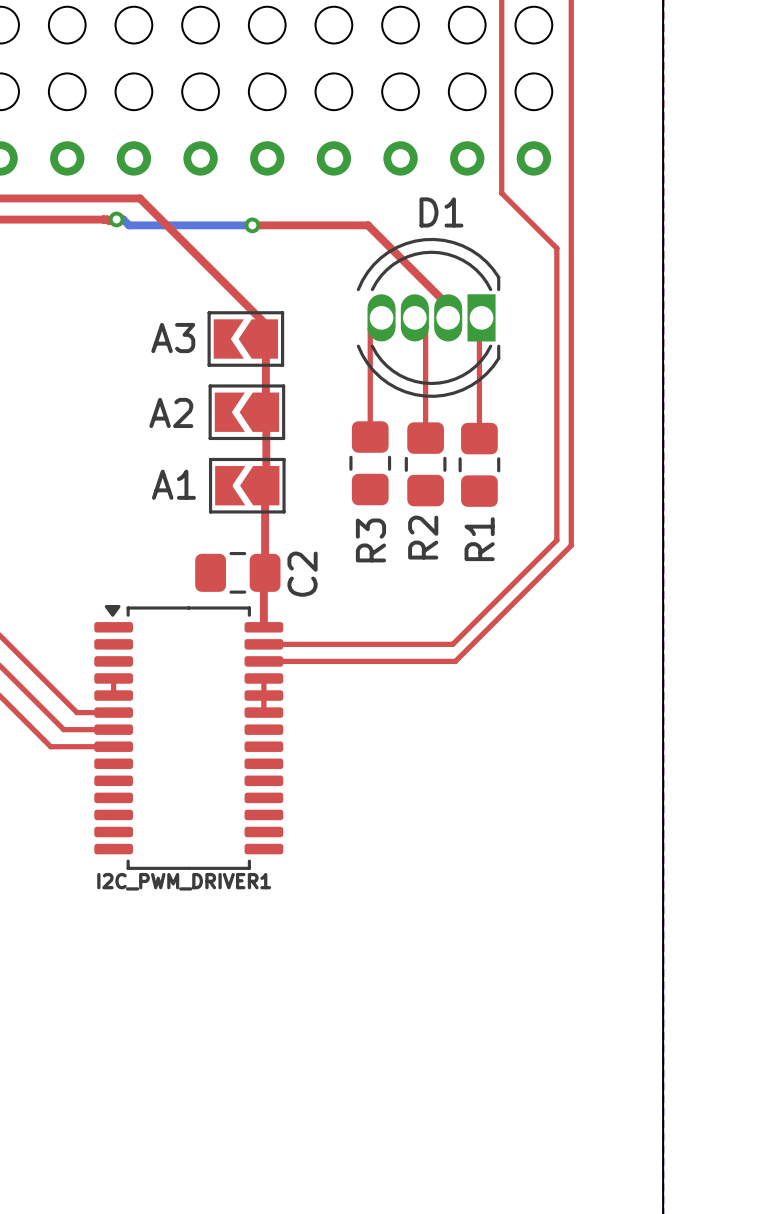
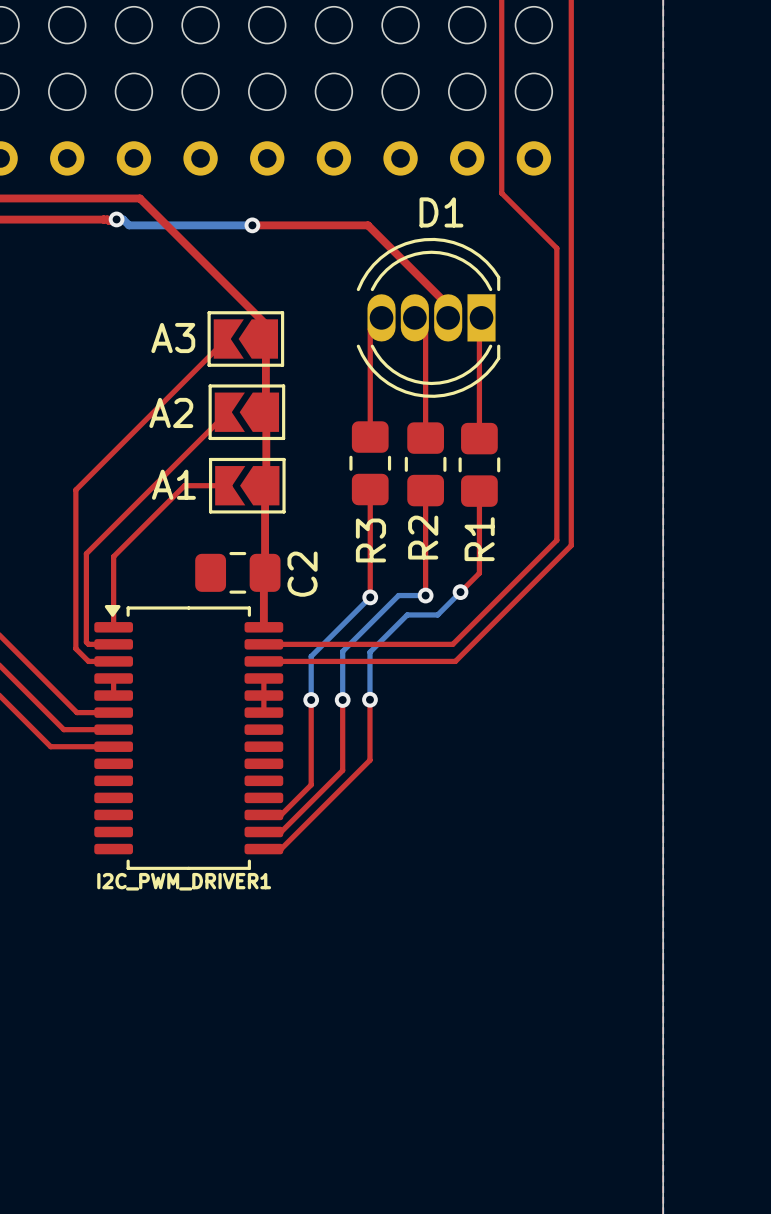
top track: none -> (226, 339) (75, 489) (75, 648) (88, 661) (113, 661)
top track: none -> (227, 412) (86, 553) (86, 642) (88, 644) (113, 644)
top track: none -> (228, 485) (184, 485) (113, 556) (113, 627)
top track: none -> (370, 489) (370, 597)
top track: none -> (425, 490) (425, 595)
top track: none -> (479, 491) (479, 573) (460, 592)
bottom track: none -> (460, 592) (437, 614) (407, 614) (369, 652) (369, 699)
via: none -> (460, 592)
bottom track: none -> (425, 595) (398, 595) (342, 651) (342, 699)
via: none -> (425, 595)
bottom track: none -> (370, 597) (311, 656) (311, 699)
via: none -> (370, 597)
top track: none -> (311, 699) (311, 784) (281, 814) (263, 814)
via: none -> (311, 699)
top track: none -> (342, 699) (342, 770) (281, 832) (263, 832)
via: none -> (342, 699)
top track: none -> (369, 699) (369, 760) (281, 849) (263, 849)
via: none -> (369, 699)

